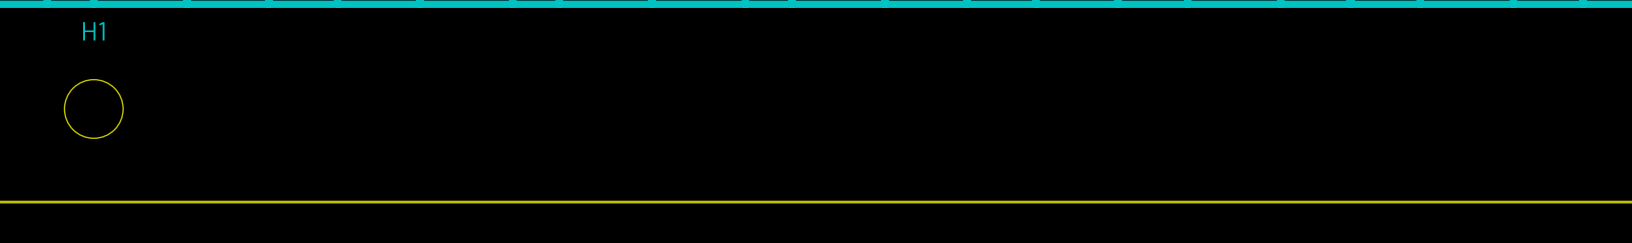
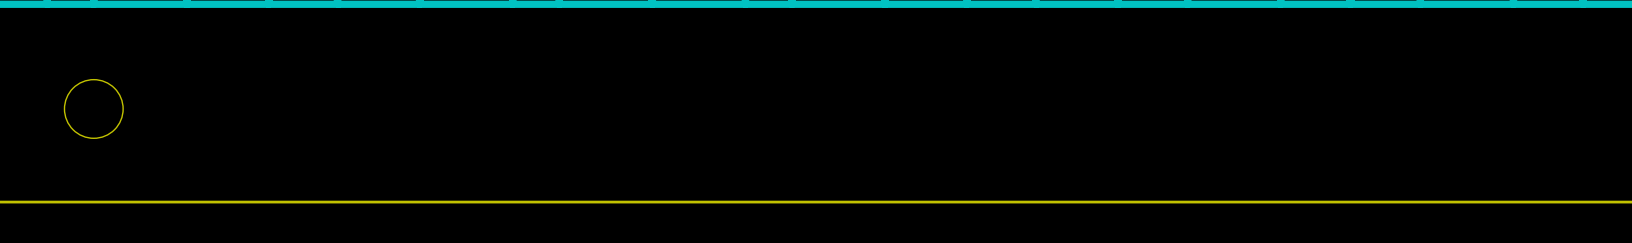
H1 name: H1 (93, 31) -> none

